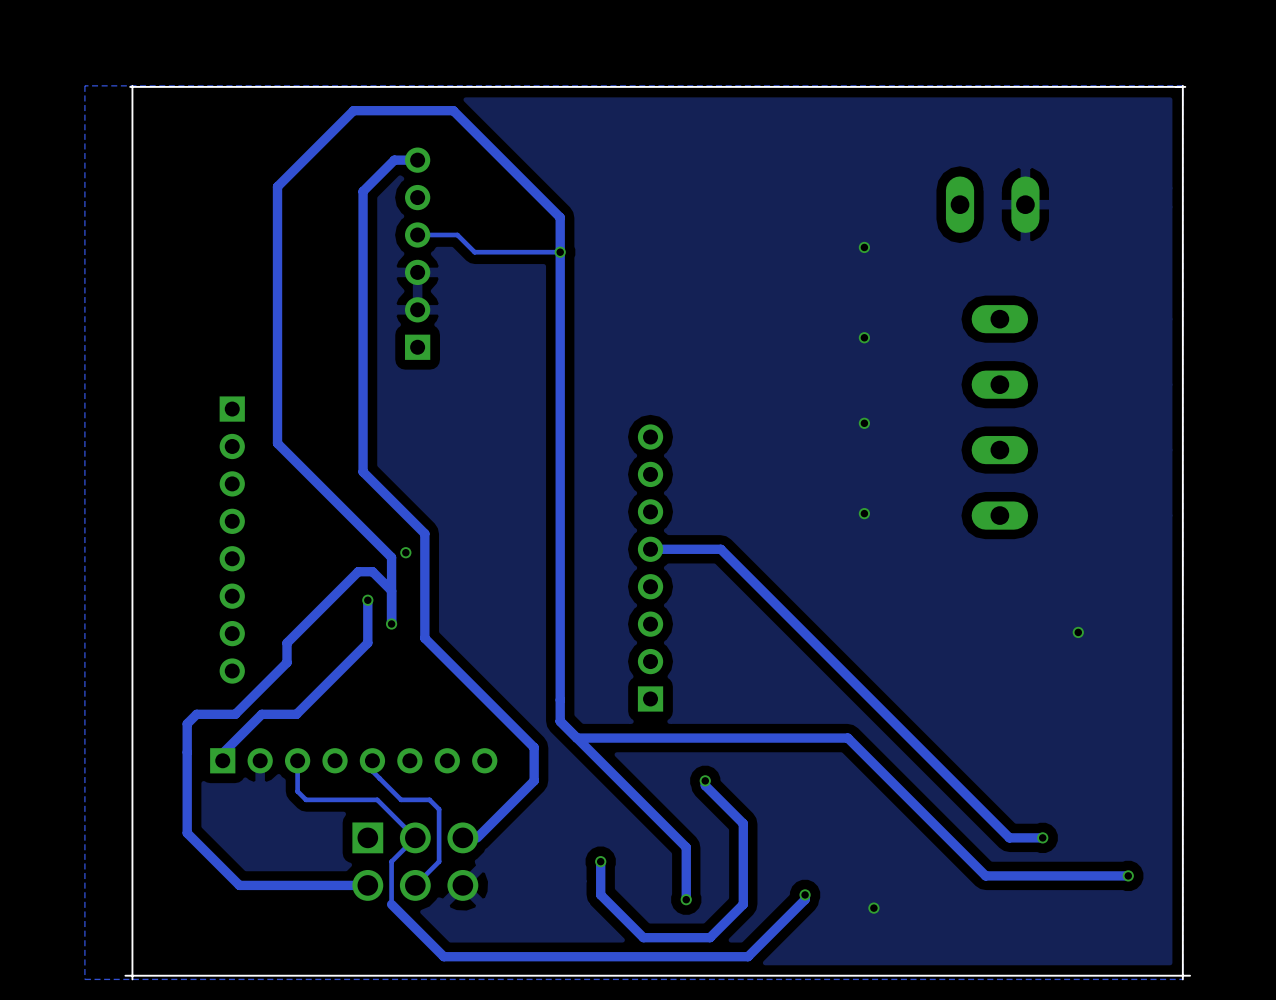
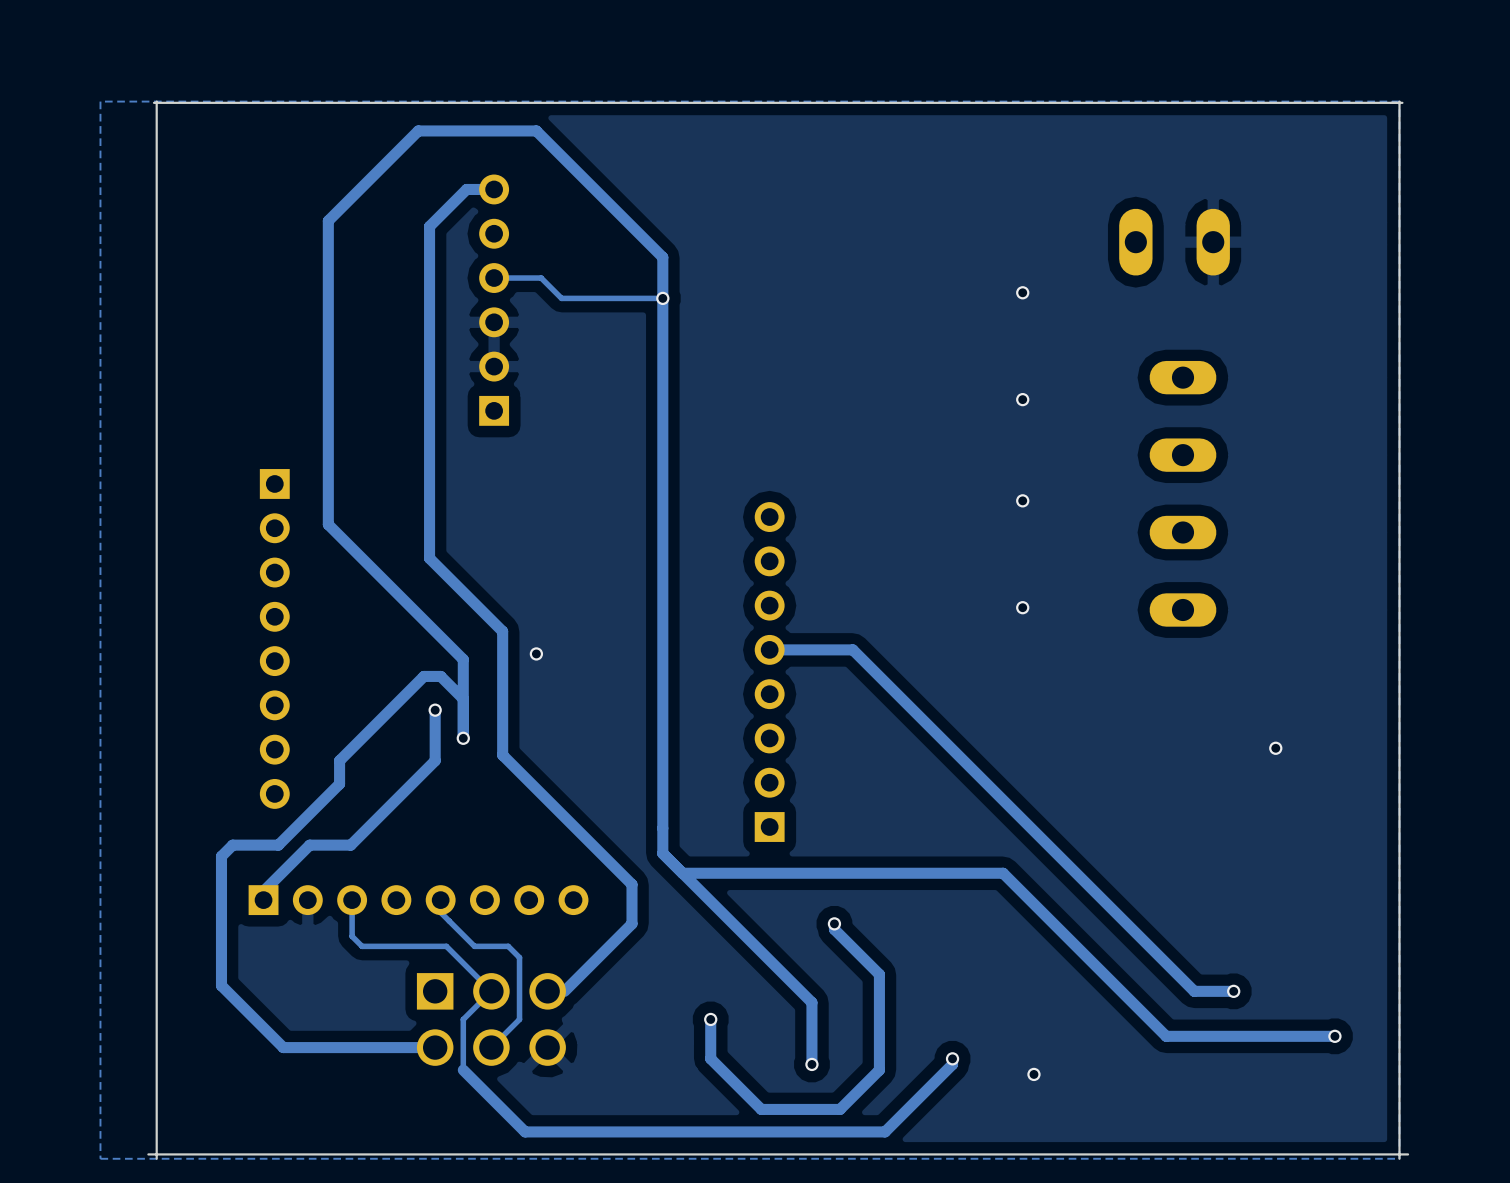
via position: (405, 552) -> (536, 653)

